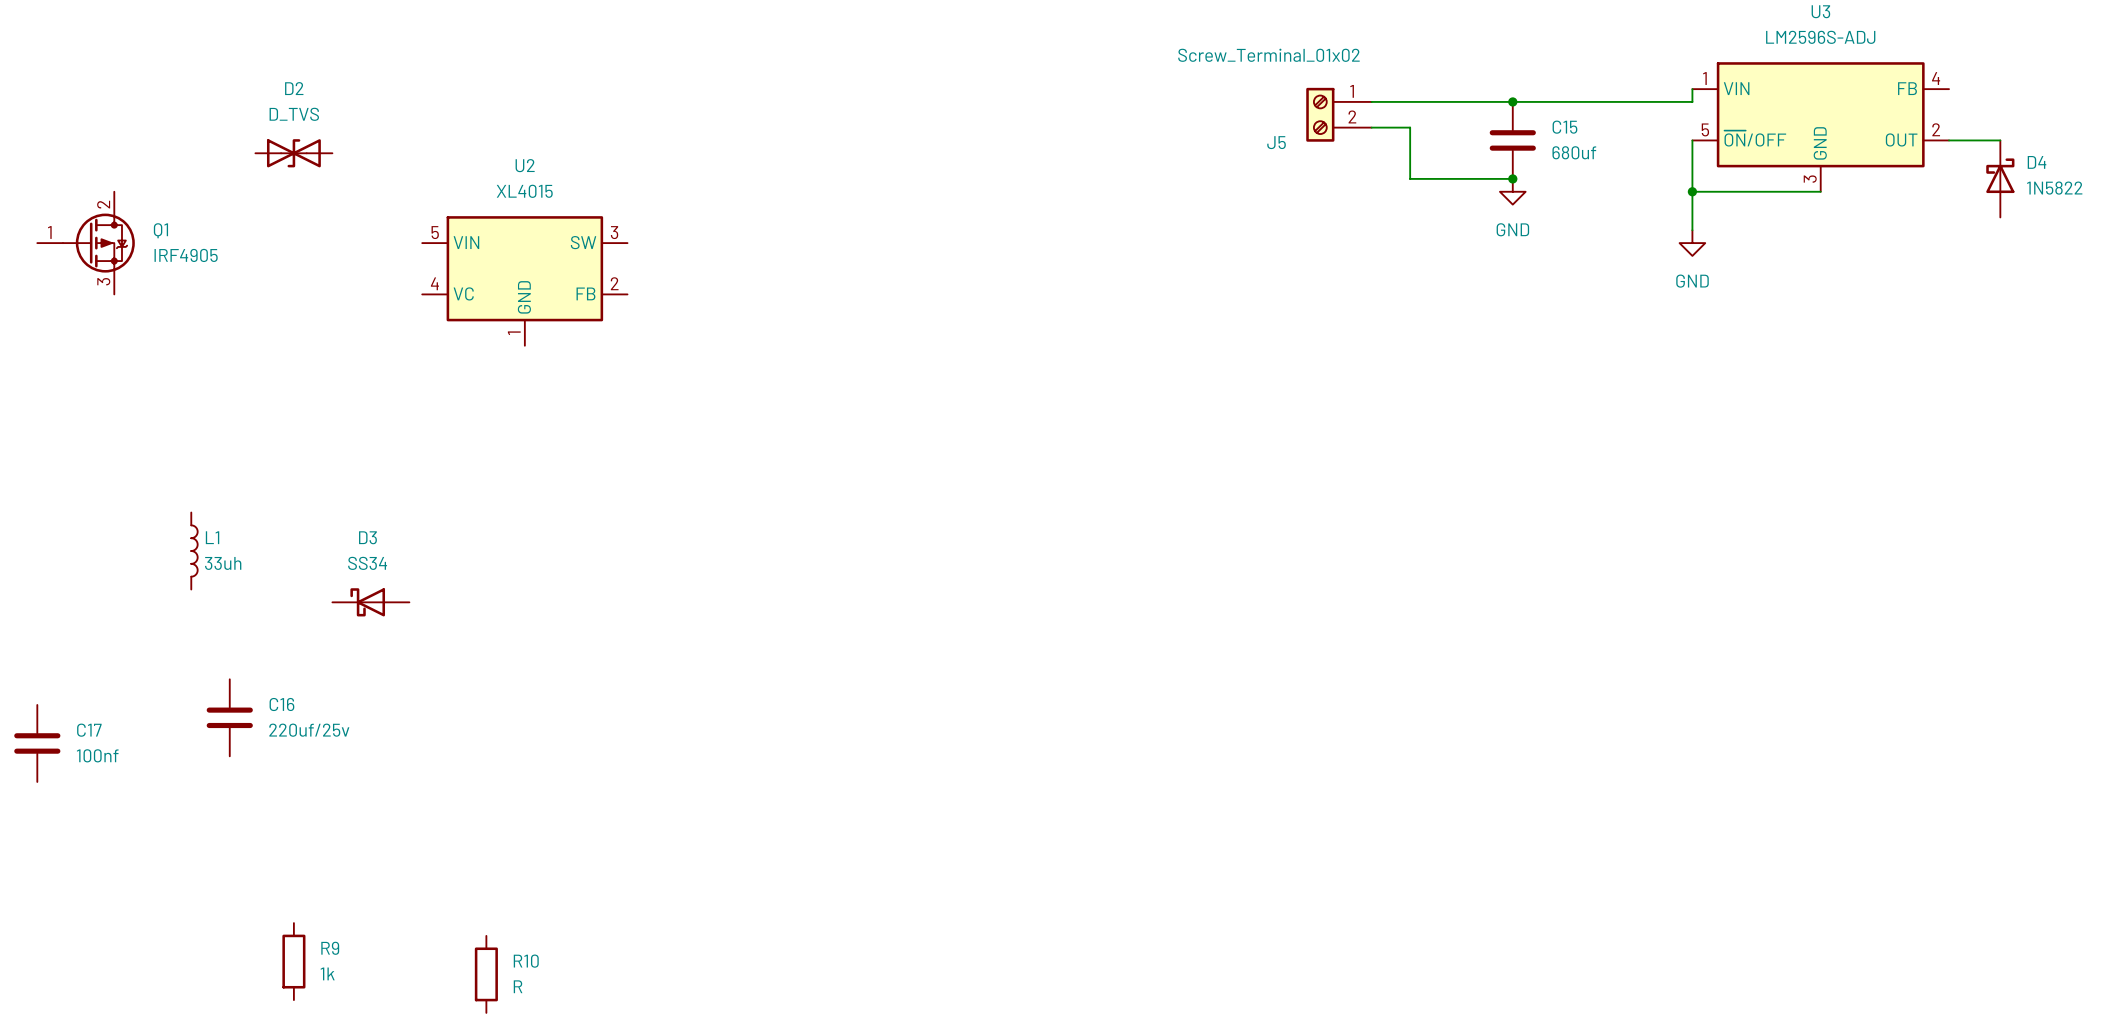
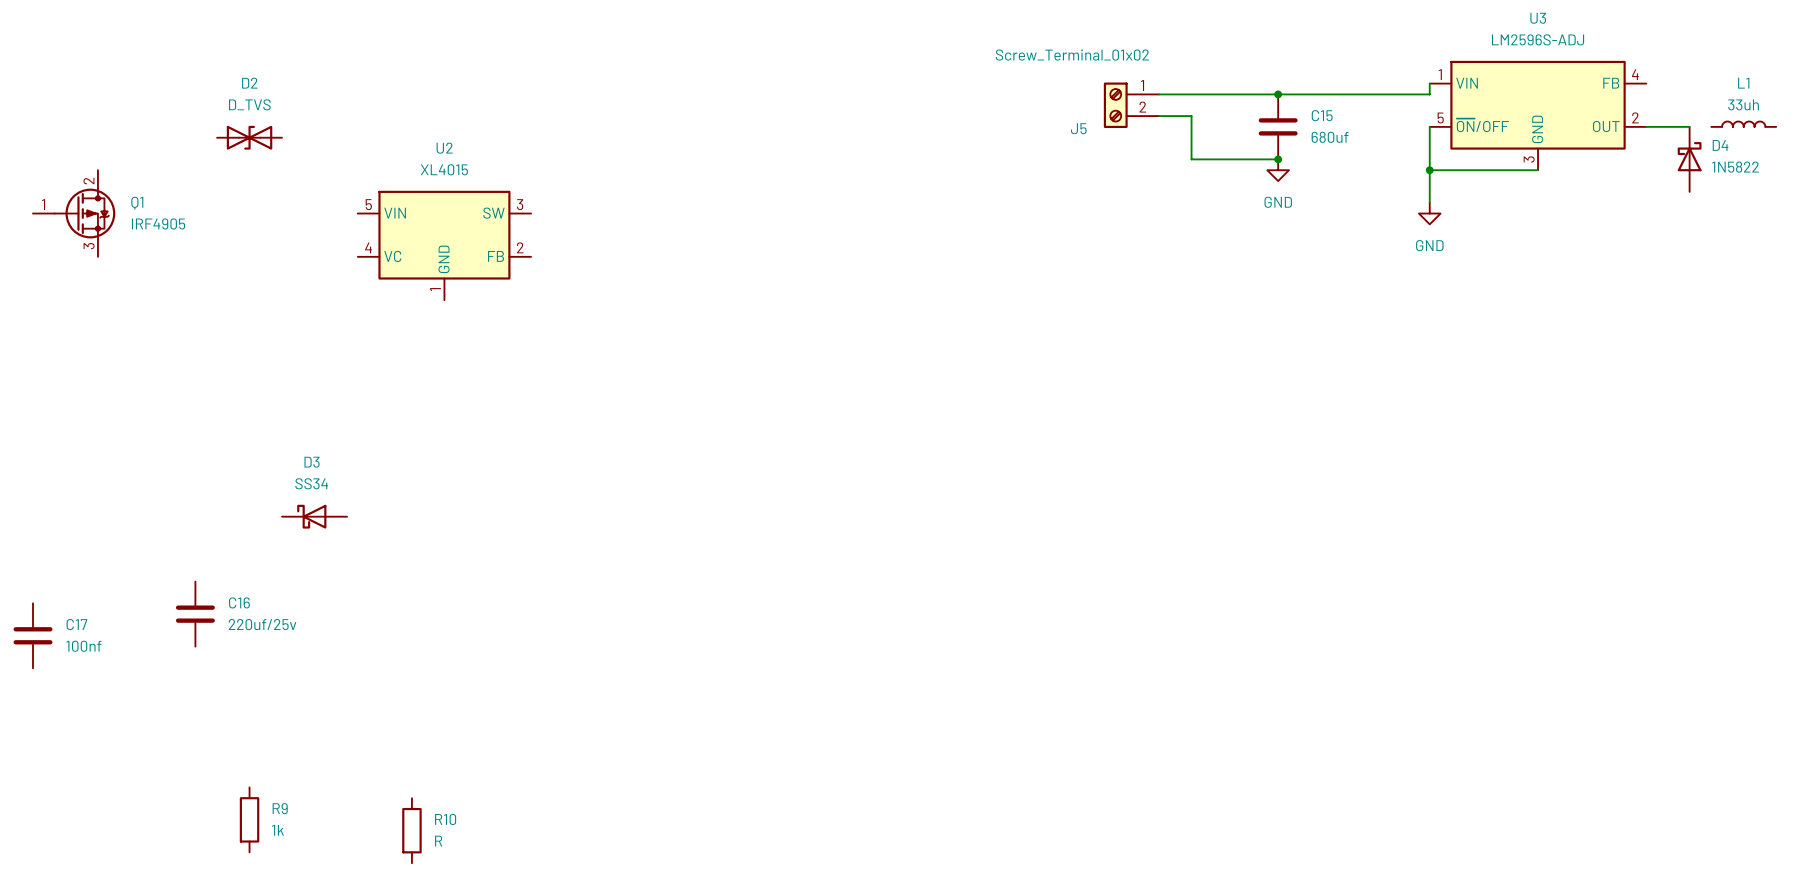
L1 name position: L1 (212, 537) -> L1 (1743, 83)
L1 rotation: 0° (194, 551) -> 90° counterclockwise (1743, 124)
L1 position: (194, 551) -> (1743, 124)
L1 value position: 33uh (223, 563) -> 33uh (1743, 104)

